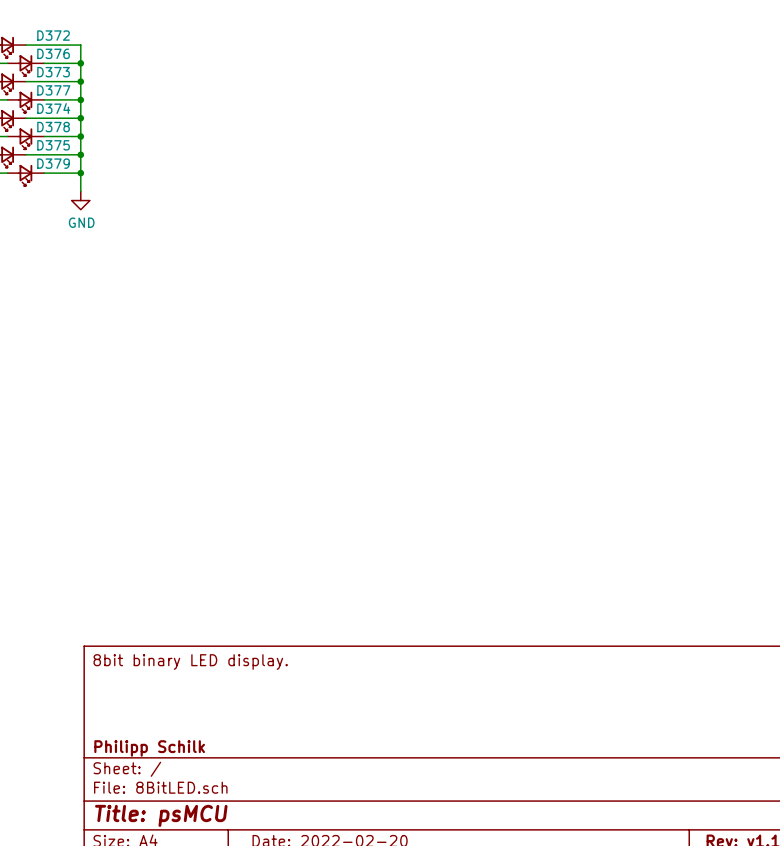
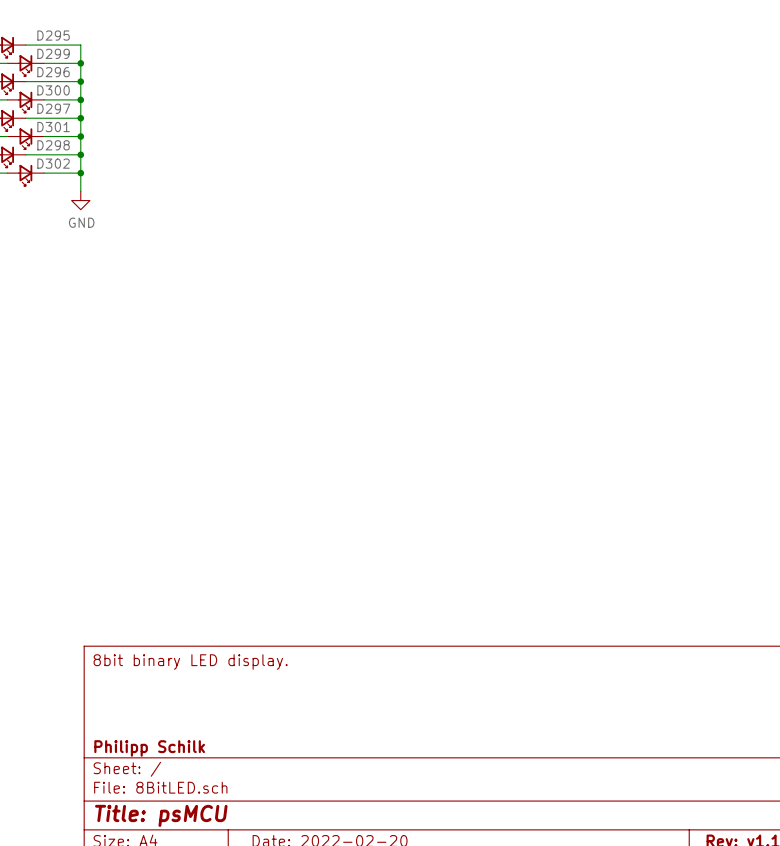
D372 name: D372 (53, 35) -> D295 (53, 35)
D376 name: D376 (53, 53) -> D299 (53, 53)
D373 name: D373 (53, 72) -> D296 (53, 72)
D377 name: D377 (53, 90) -> D300 (53, 90)
D374 name: D374 (53, 108) -> D297 (53, 108)
D378 name: D378 (53, 127) -> D301 (53, 127)
D375 name: D375 (53, 145) -> D298 (53, 145)
D379 name: D379 (53, 163) -> D302 (53, 163)

